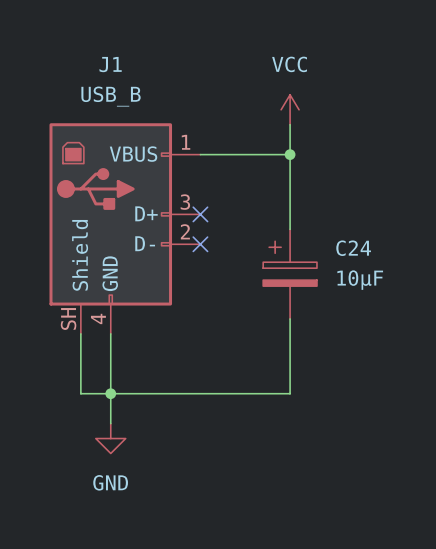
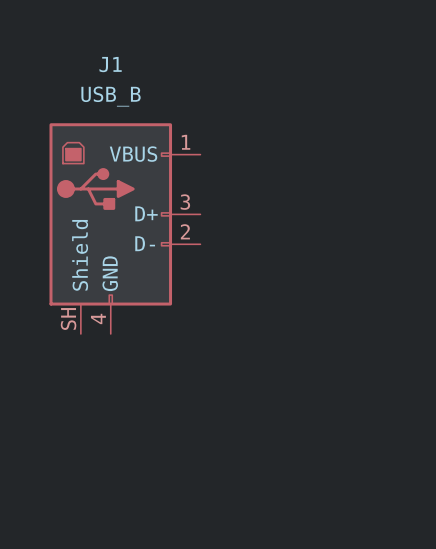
power symbol: VCC (290, 109) -> none
wire: (290, 124) (290, 229) -> none
wire: (200, 154) (290, 154) -> none
junction: (290, 154) -> none
no-connect mark: (200, 214) -> none
no-connect mark: (200, 244) -> none
C24: 10µF (290, 274) -> none
wire: (290, 318) (290, 393) (80, 393) (80, 333) -> none
wire: (110, 333) (110, 423) -> none
junction: (110, 393) -> none
power symbol: GND (110, 438) -> none

